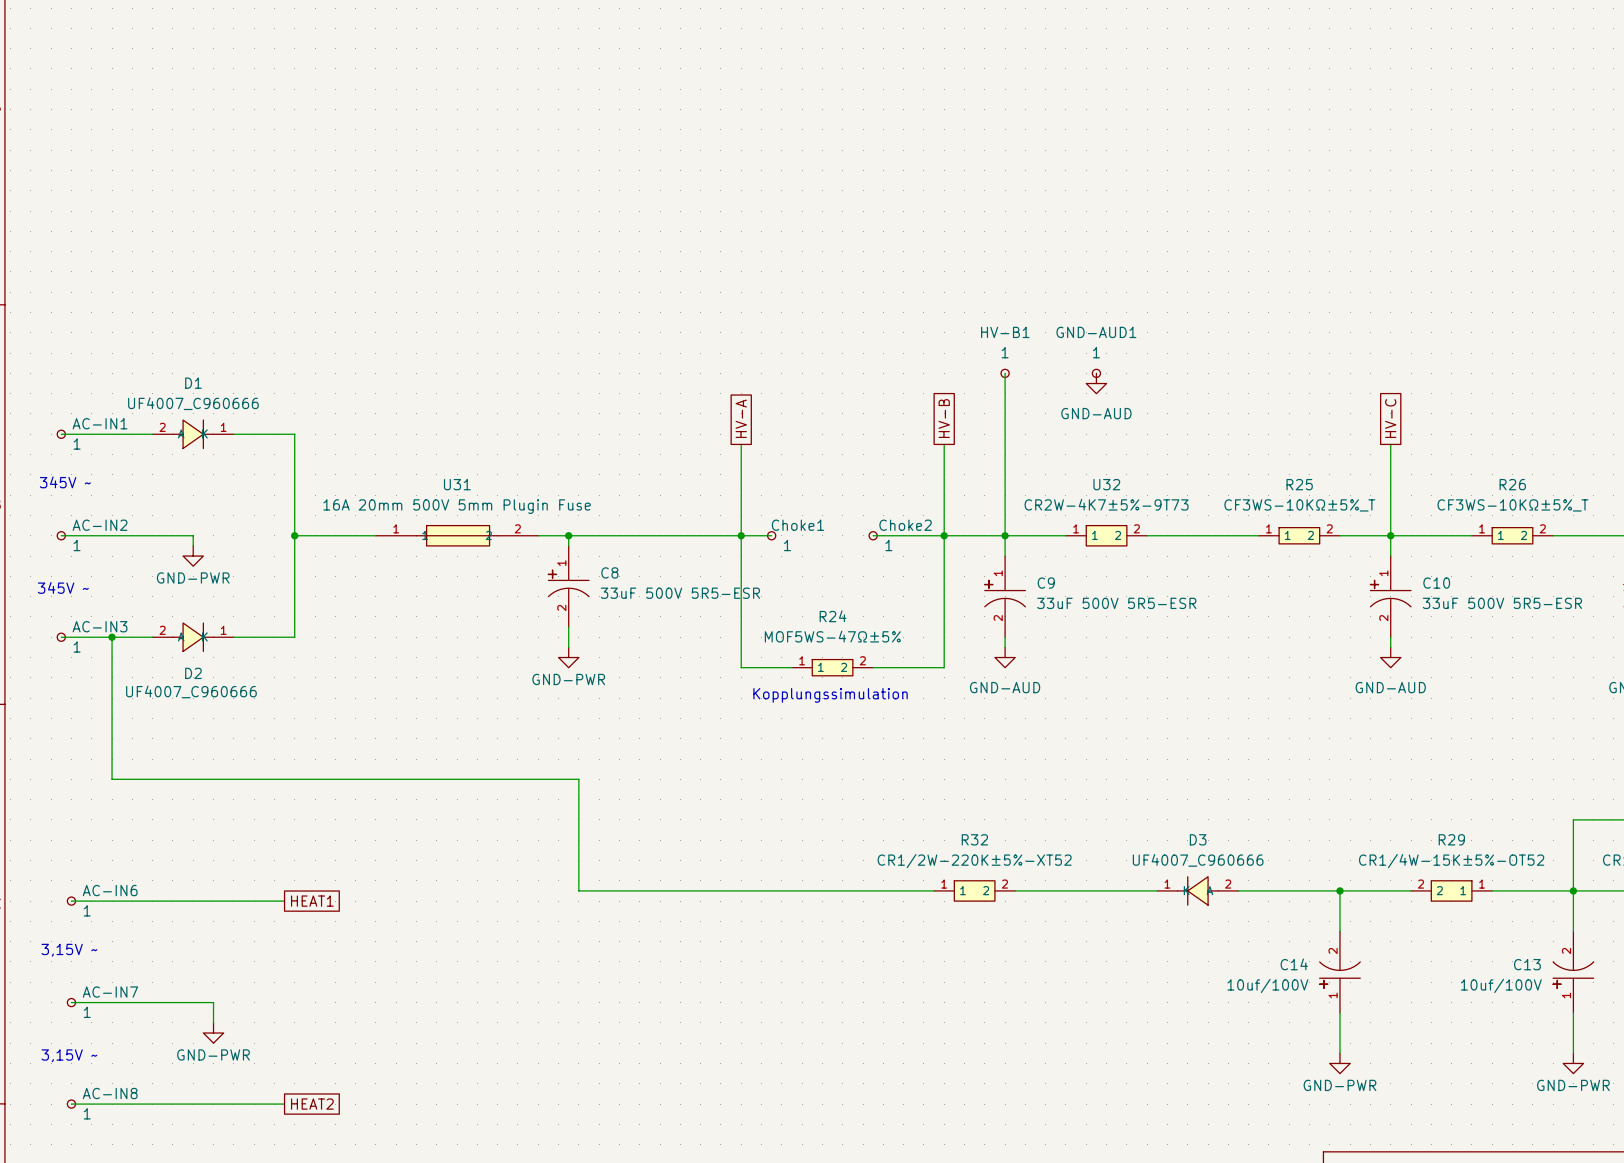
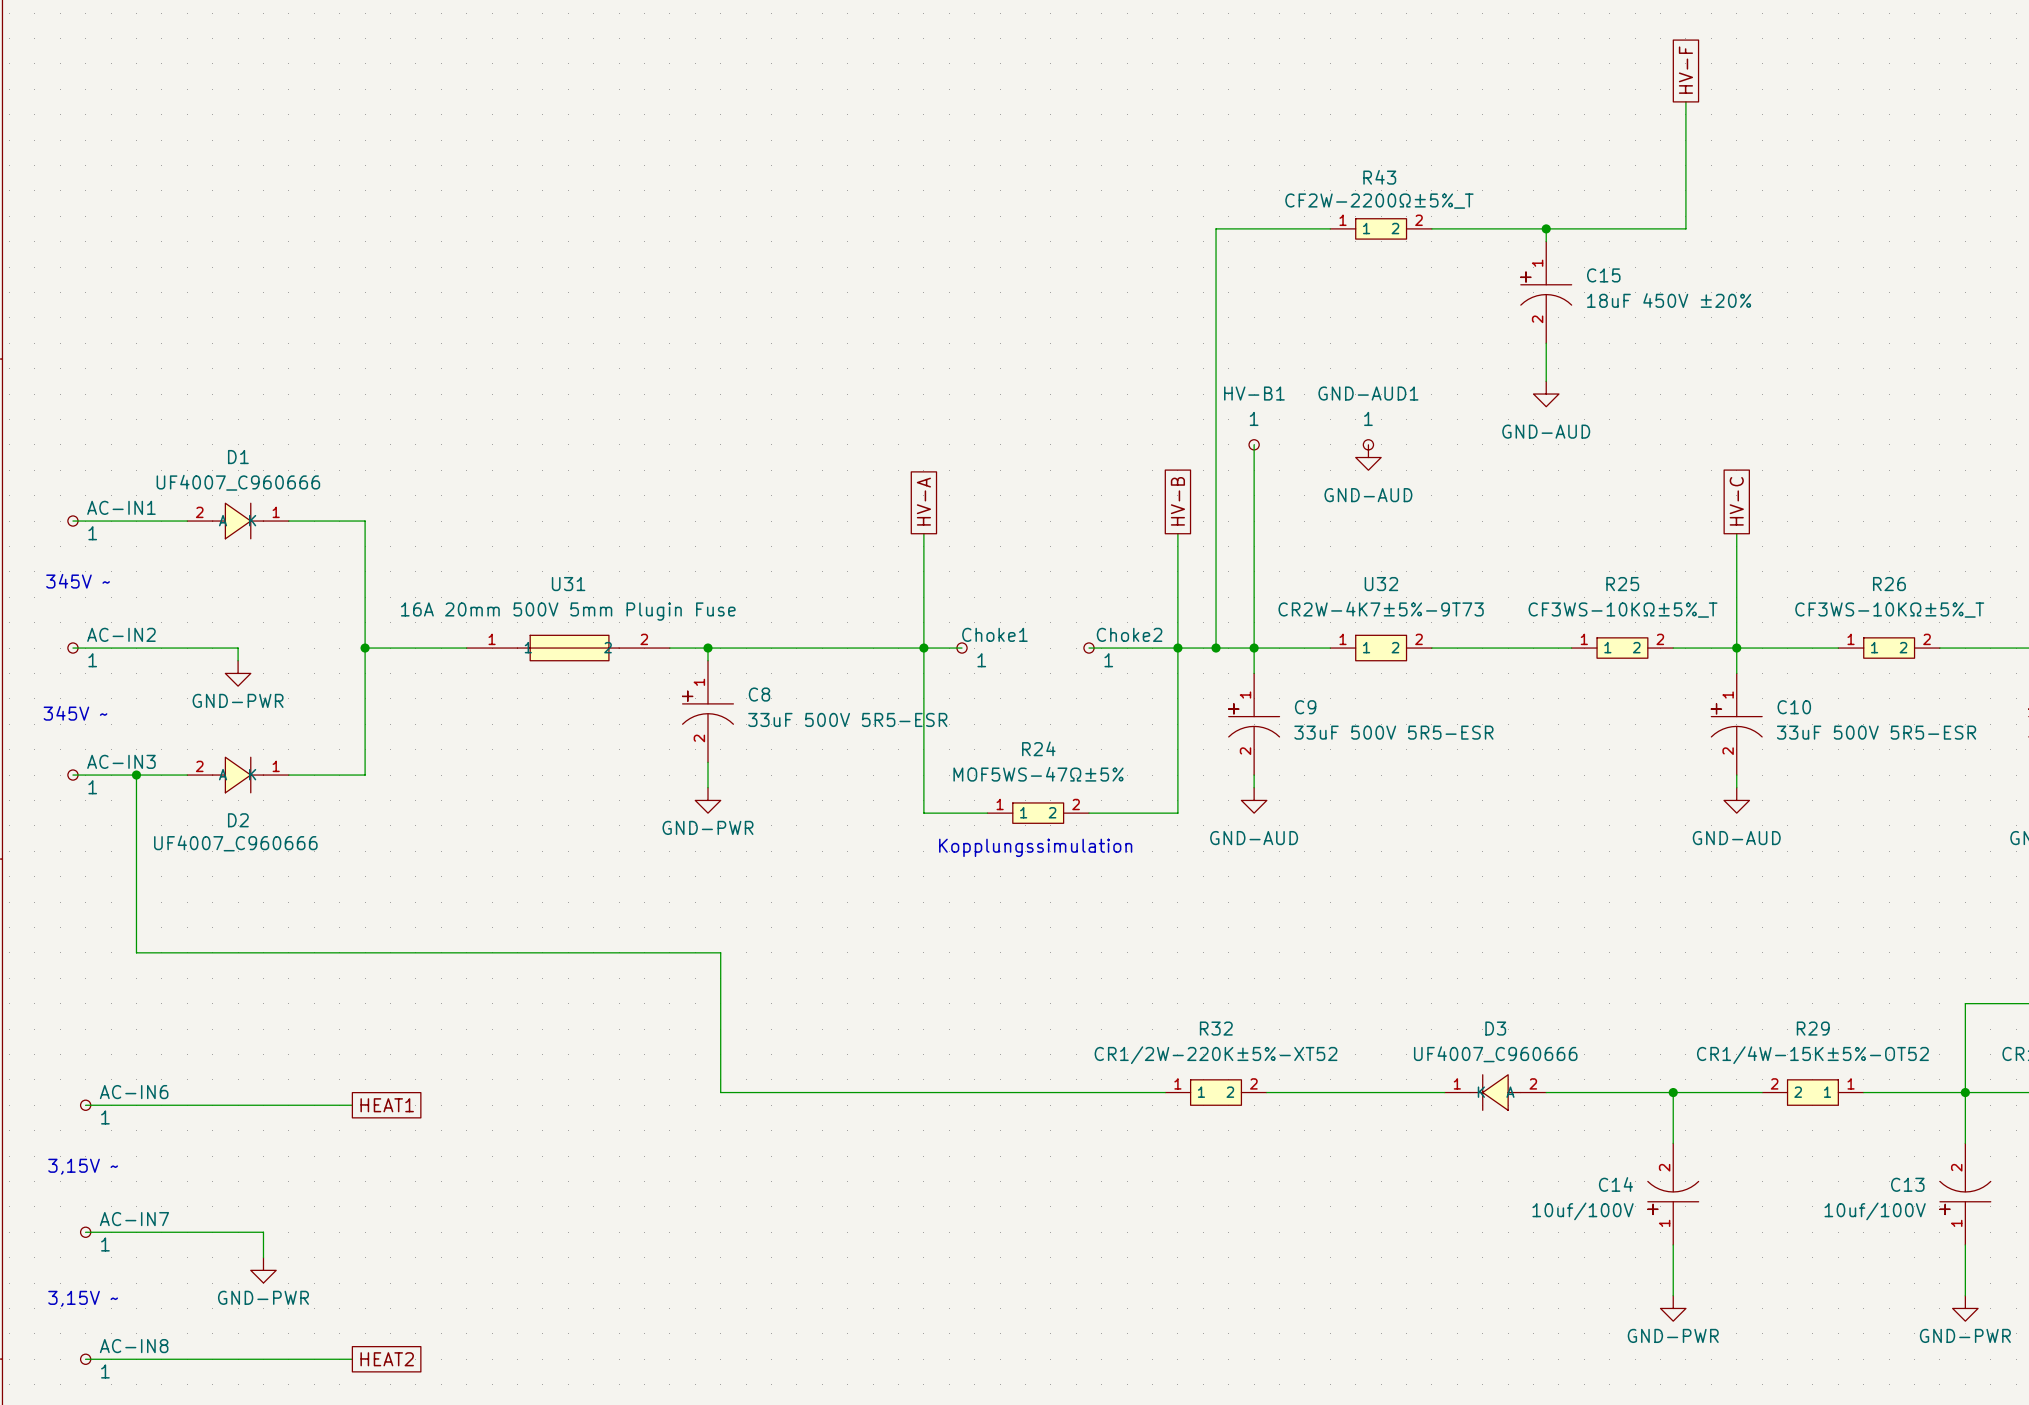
global label: none -> HV-F (1685, 70)
wire: none -> (1685, 101) (1685, 228) (1431, 228)
wire: none -> (1330, 228) (1216, 228) (1216, 648)
R43: none -> CF2W-2200Ω±5%_T (1381, 228)
wire: none -> (1546, 228) (1546, 241)
junction: none -> (1546, 228)
C15: none -> 18uF 450V ±20% (1546, 292)
wire: none -> (1546, 343) (1546, 381)
power symbol: none -> GND-AUD (1546, 394)
junction: none -> (1216, 648)

